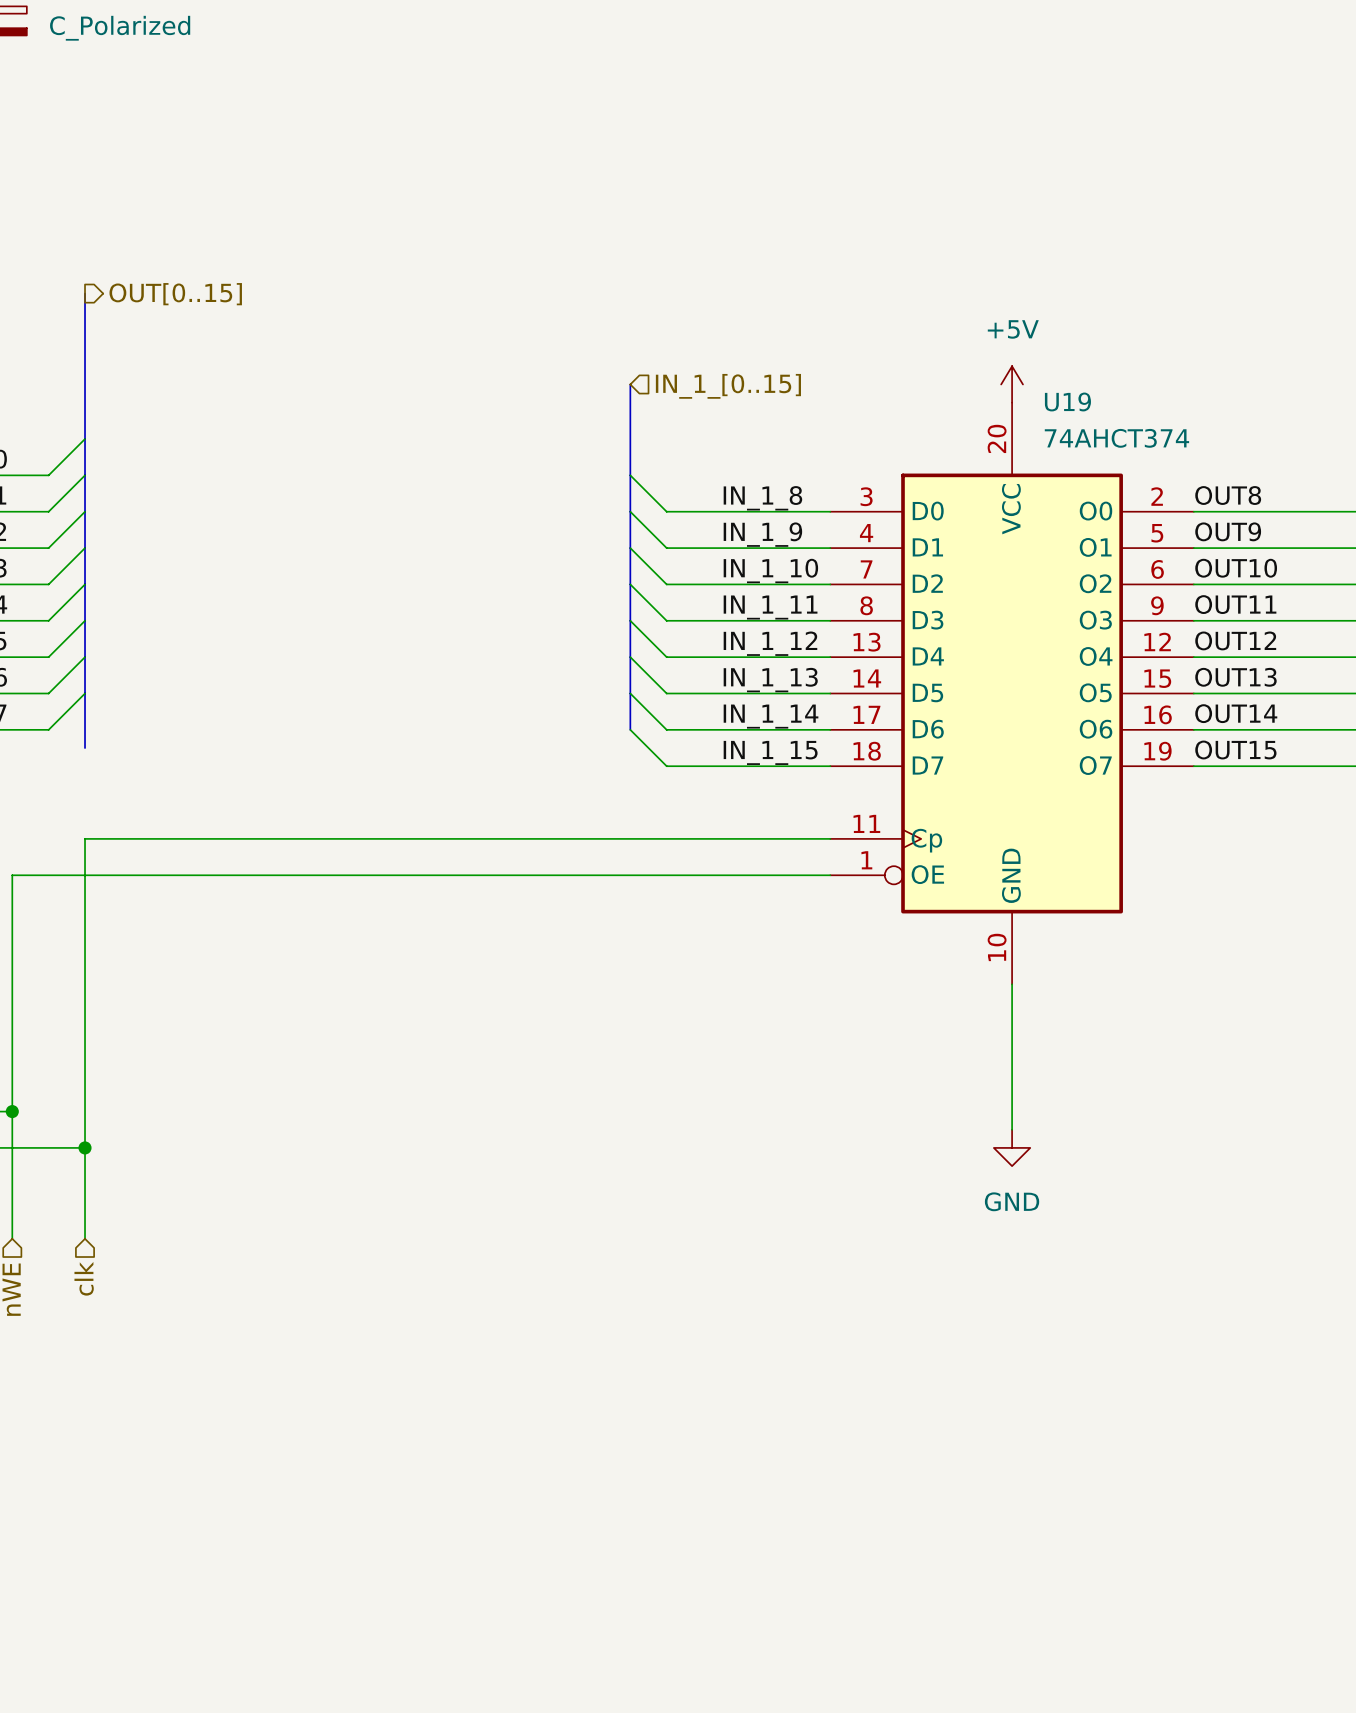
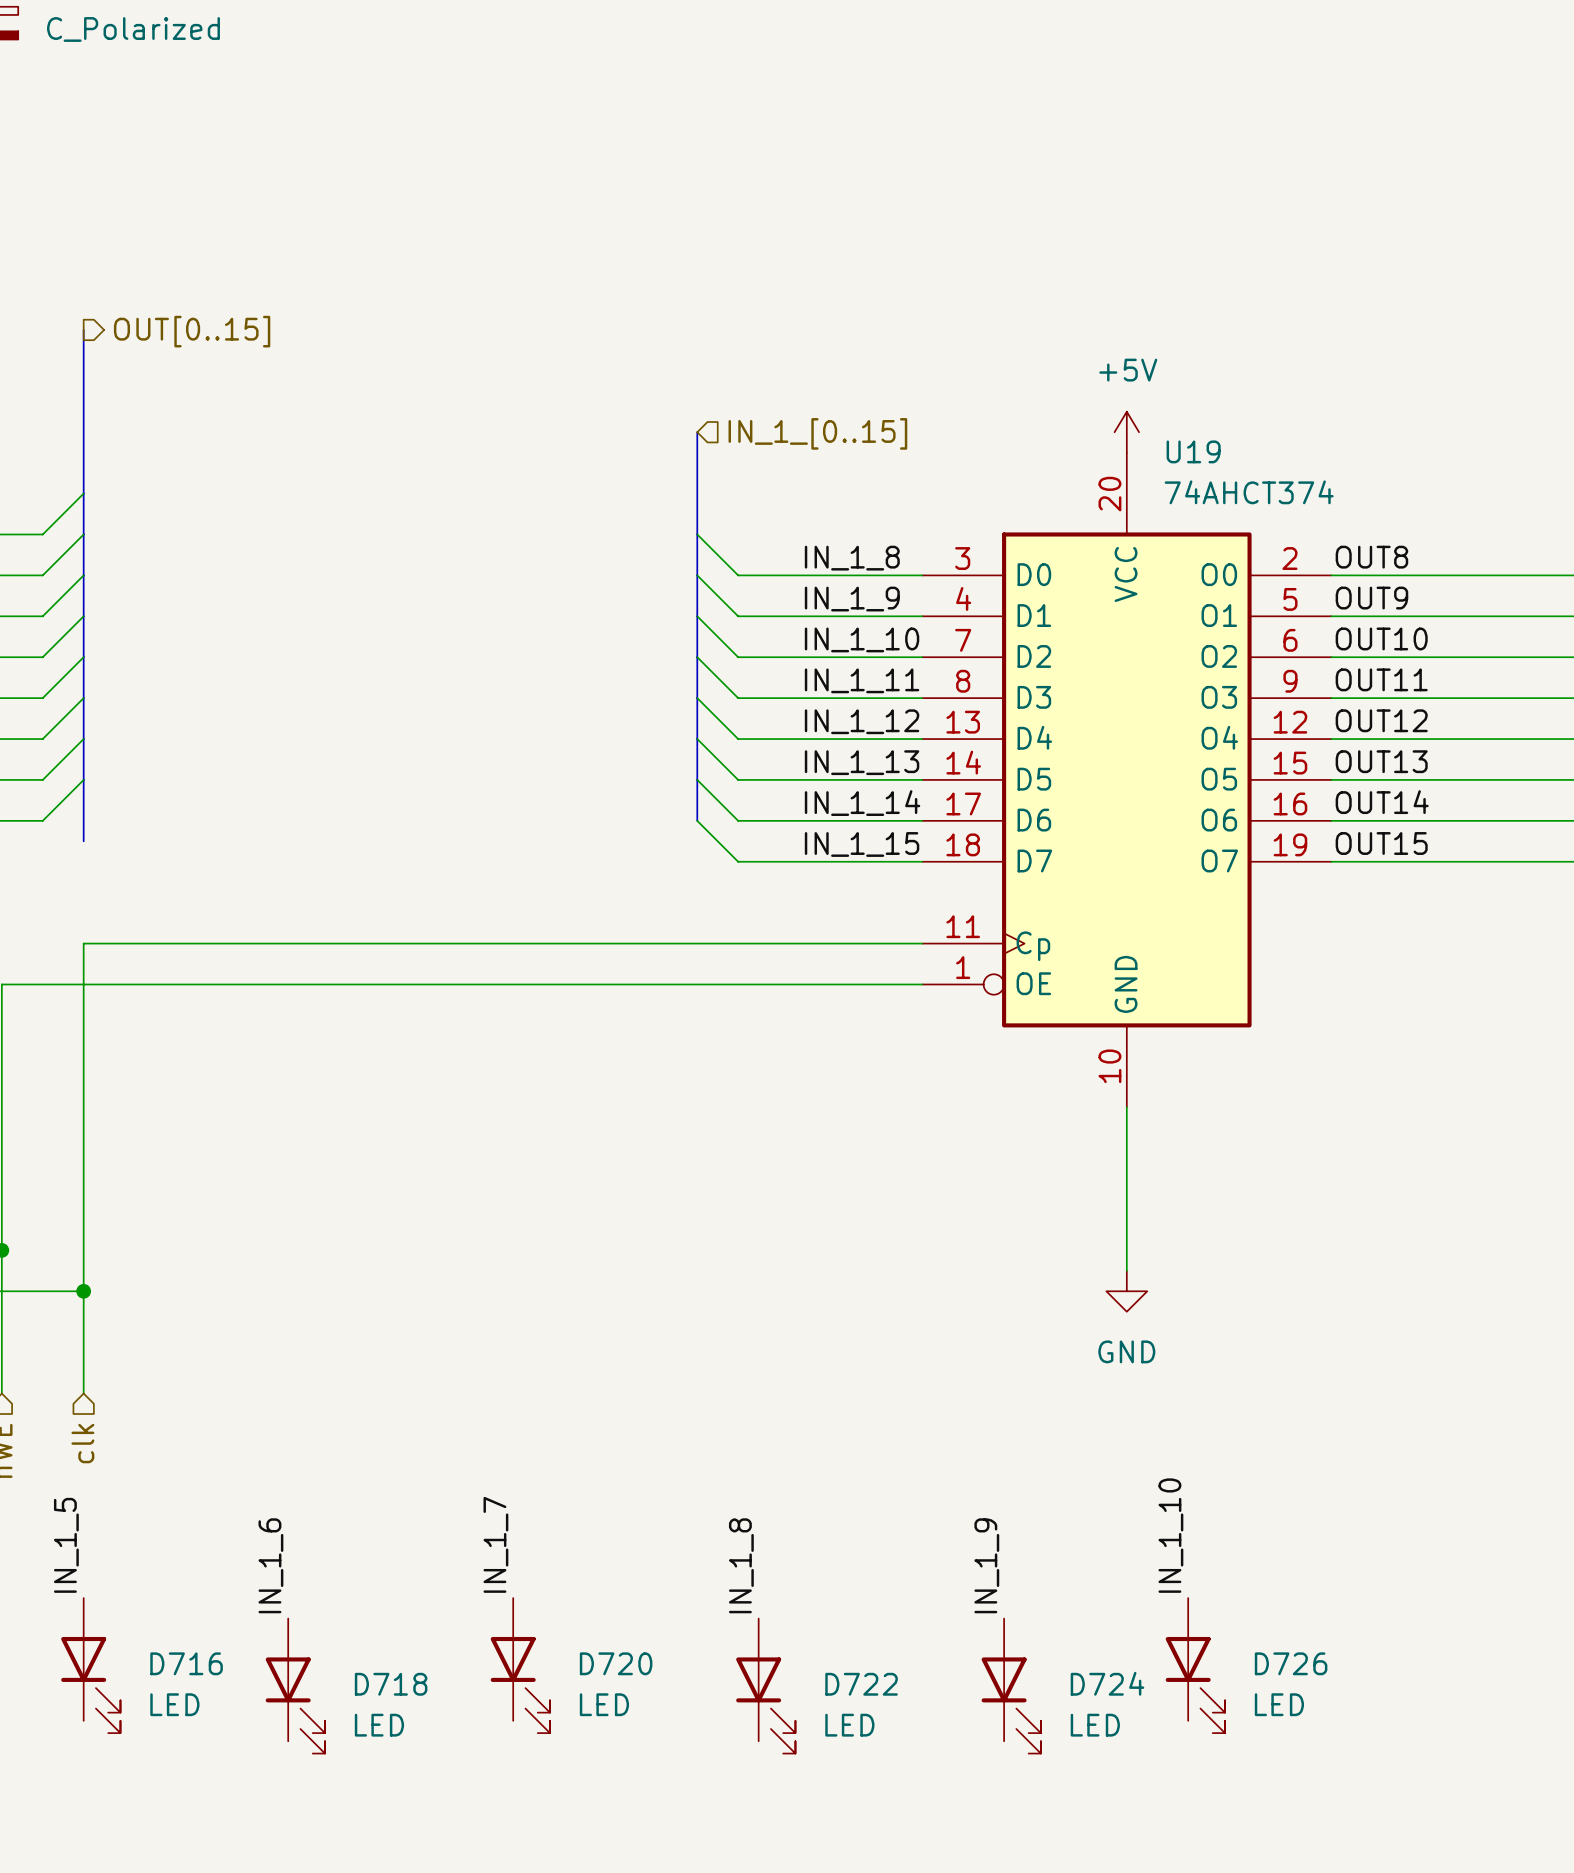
label: none -> IN_1_10 (1170, 1535)
label: none -> IN_1_5 (66, 1545)
label: none -> IN_1_7 (495, 1544)
label: none -> IN_1_6 (270, 1565)
label: none -> IN_1_8 (741, 1565)
label: none -> IN_1_9 (986, 1565)
D716: none -> LED (90, 1665)
D720: none -> LED (520, 1665)
D726: none -> LED (1195, 1665)
D718: none -> LED (295, 1686)
D722: none -> LED (765, 1686)
D724: none -> LED (1011, 1686)

